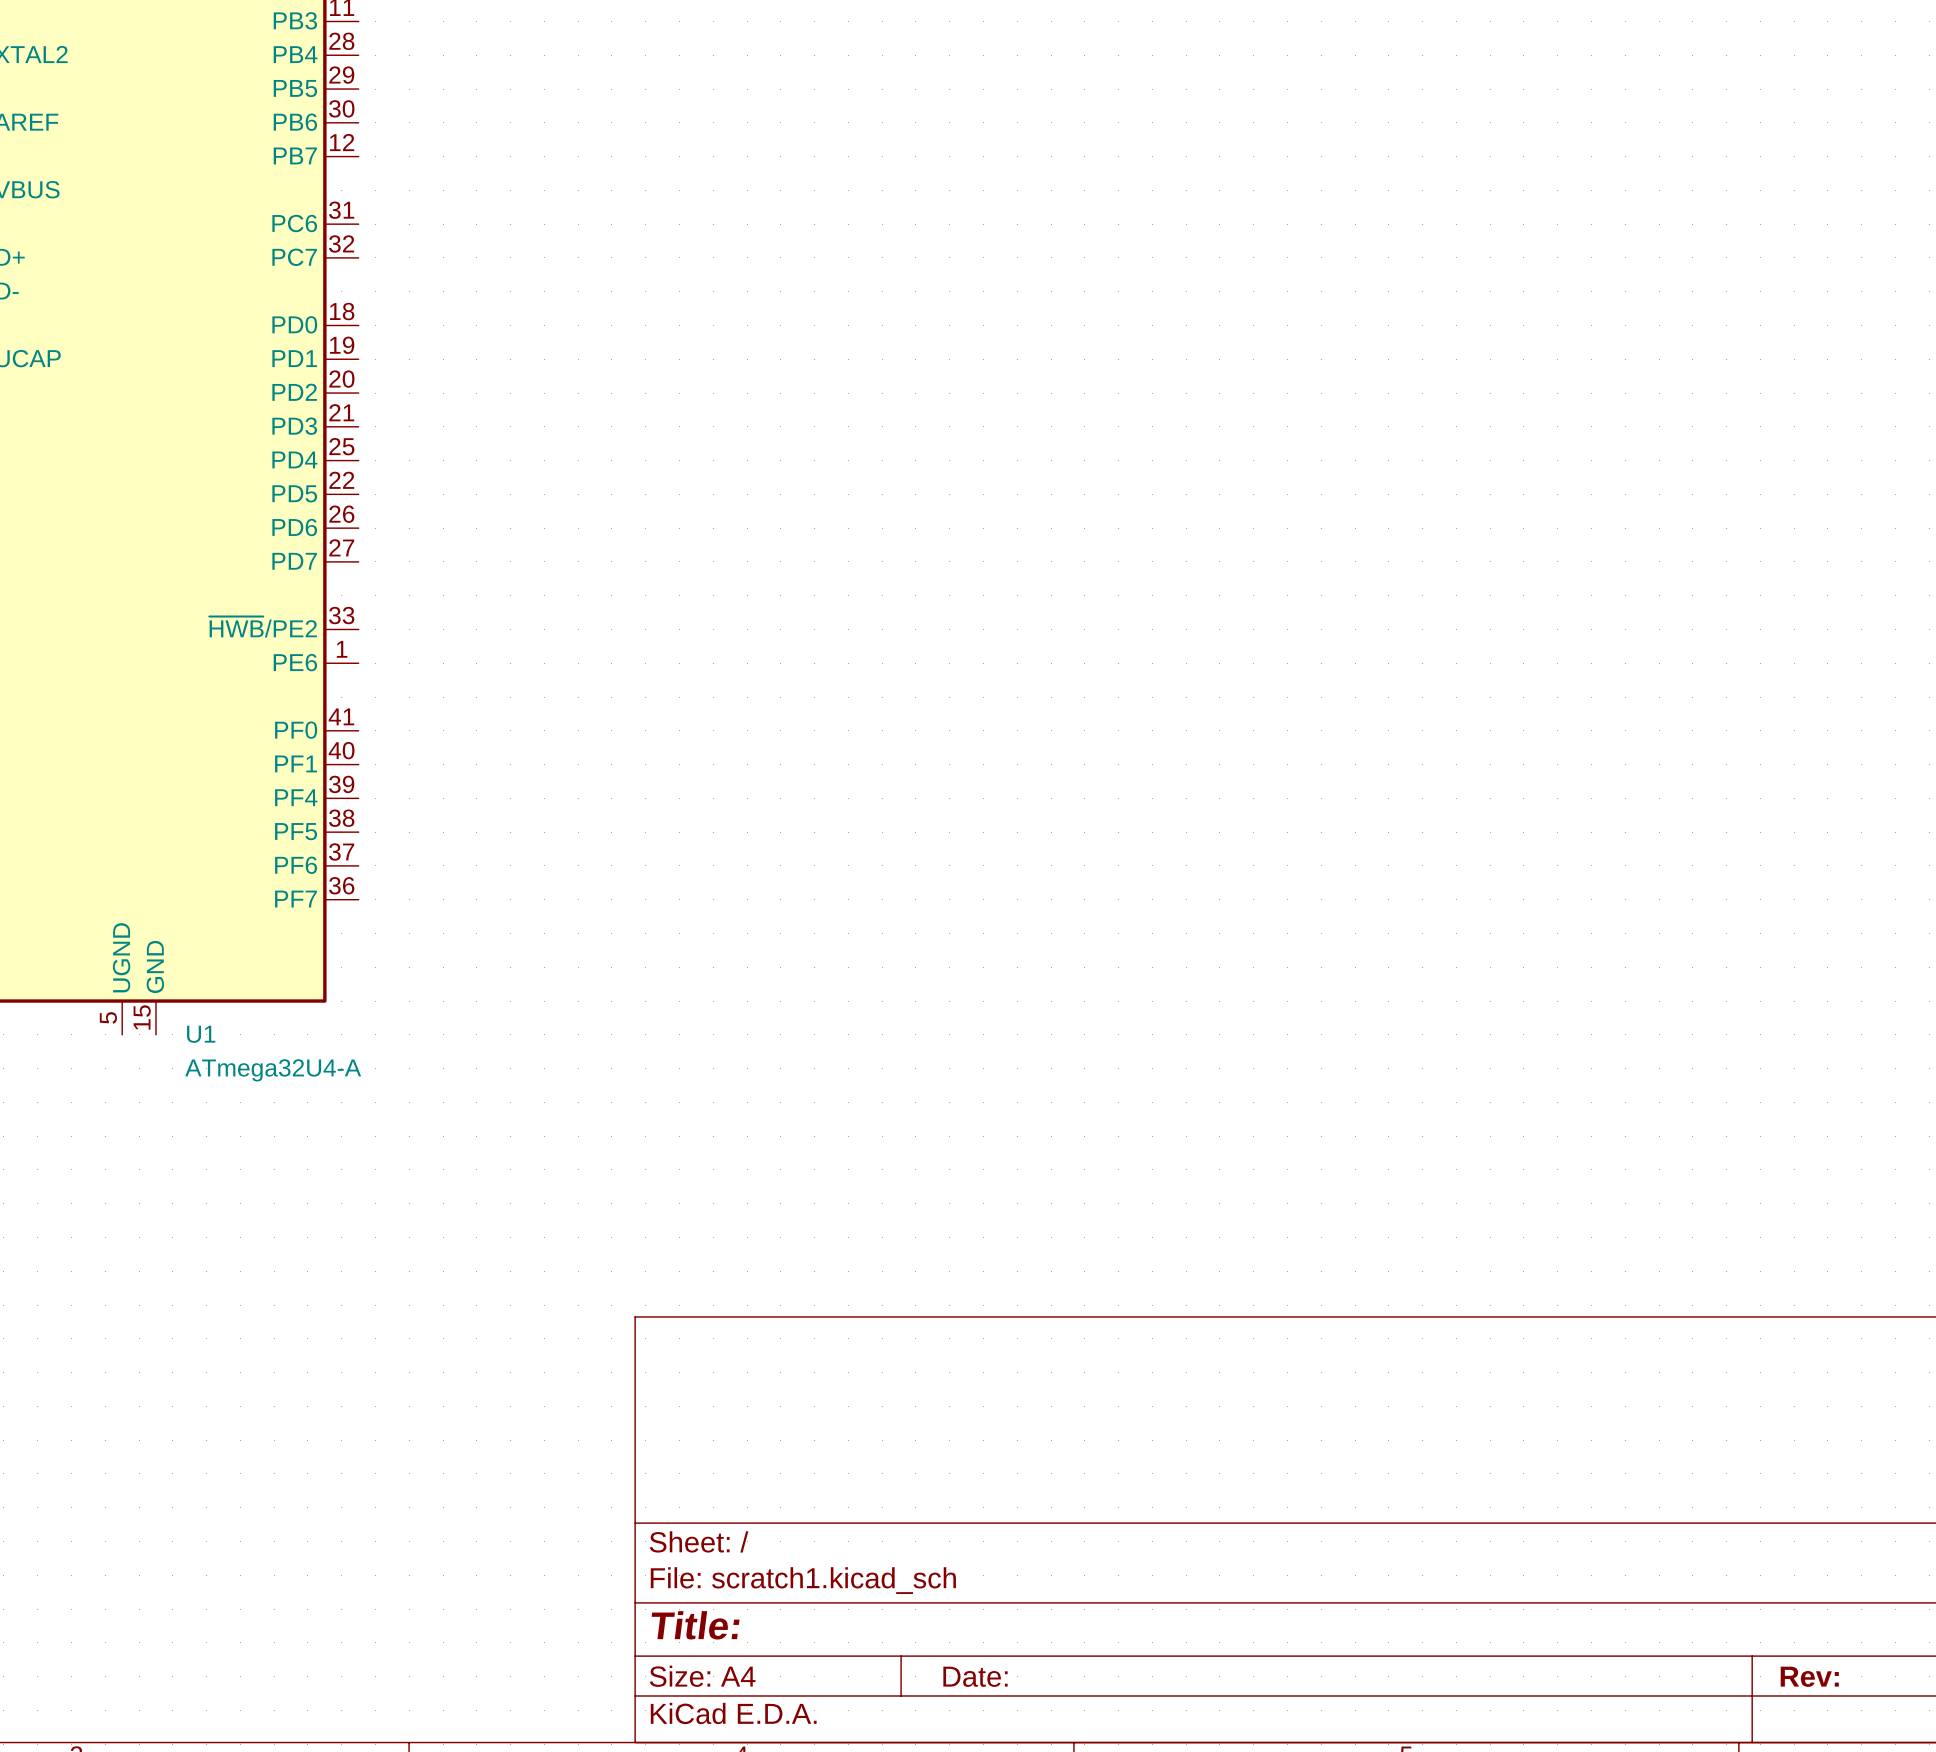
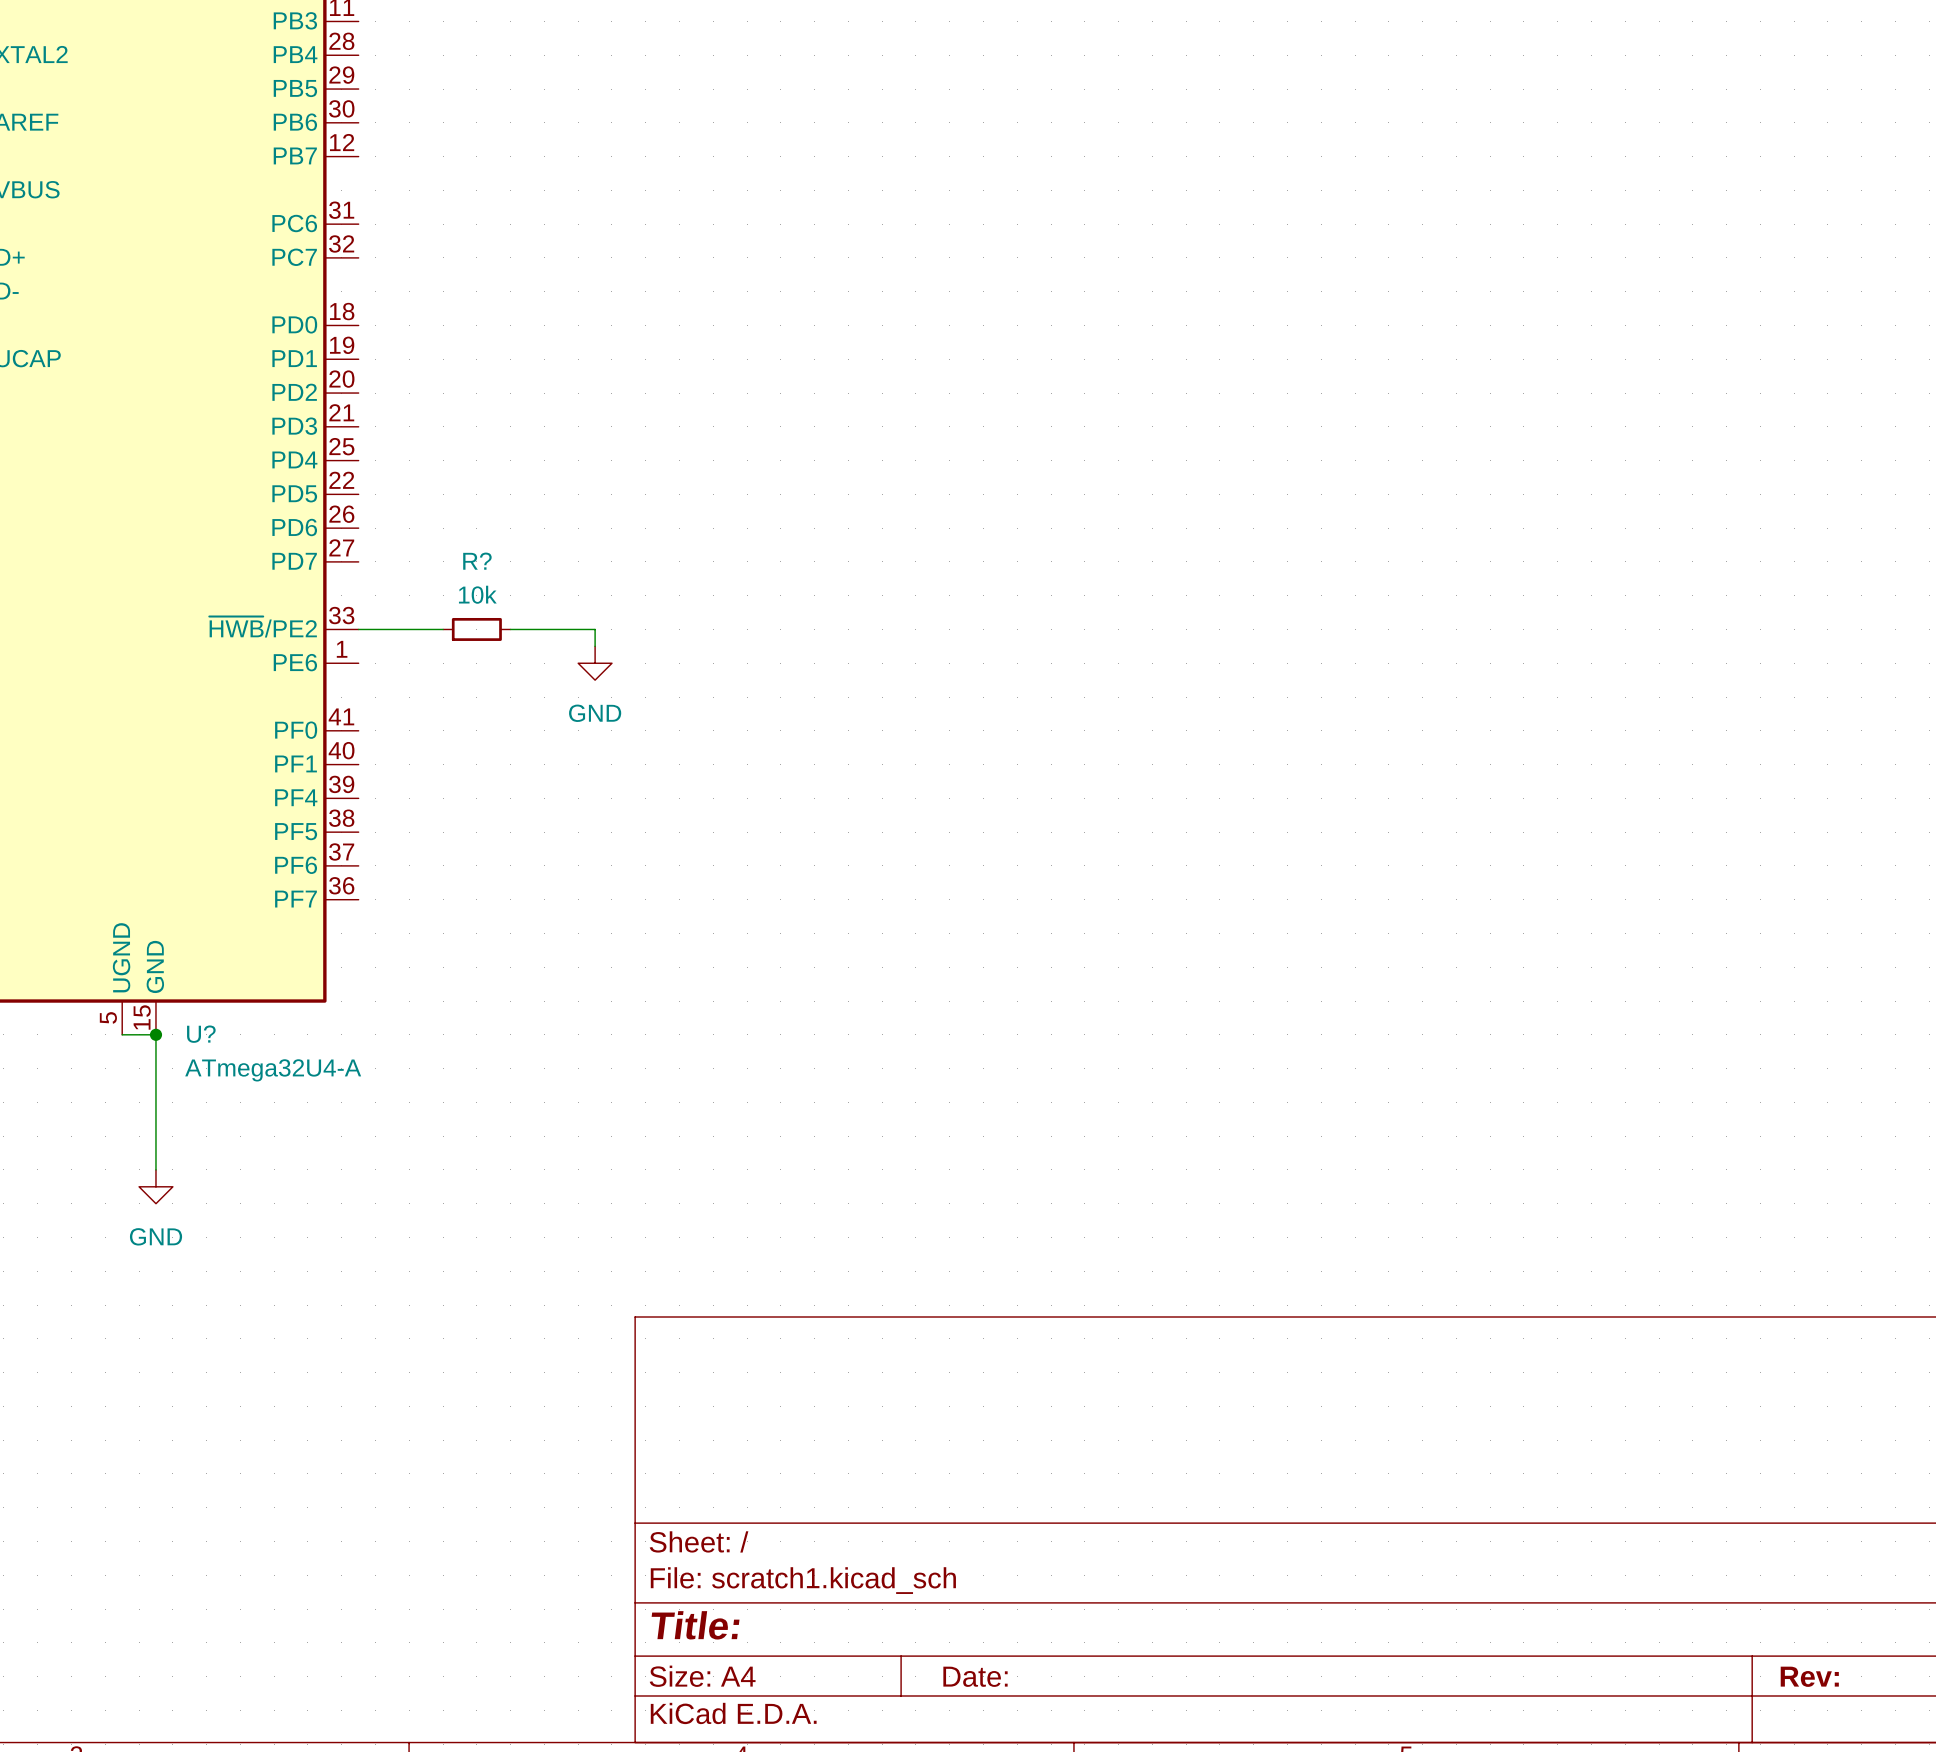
wire: none -> (358, 629) (443, 629)
R?: none -> 10k (476, 629)
wire: none -> (510, 629) (595, 629) (595, 646)
power symbol: none -> GND (595, 663)
wire: none -> (122, 1034) (155, 1034) (155, 1169)
junction: none -> (155, 1034)
U1 name: U1 (201, 1034) -> U? (201, 1034)
power symbol: none -> GND (155, 1186)

